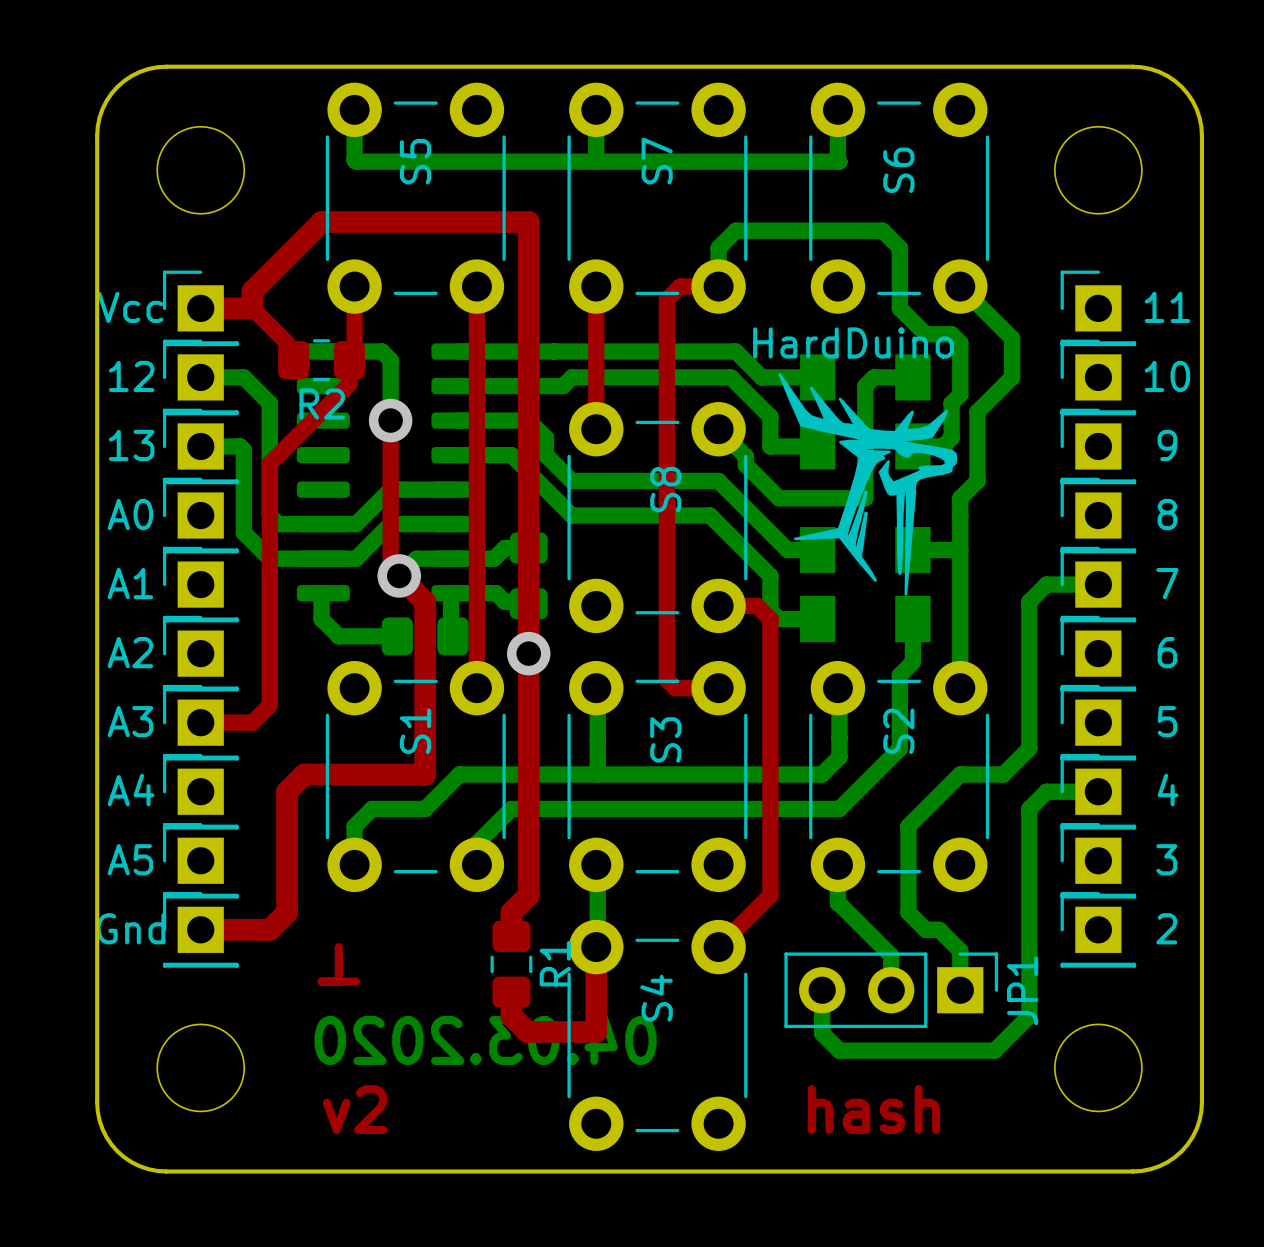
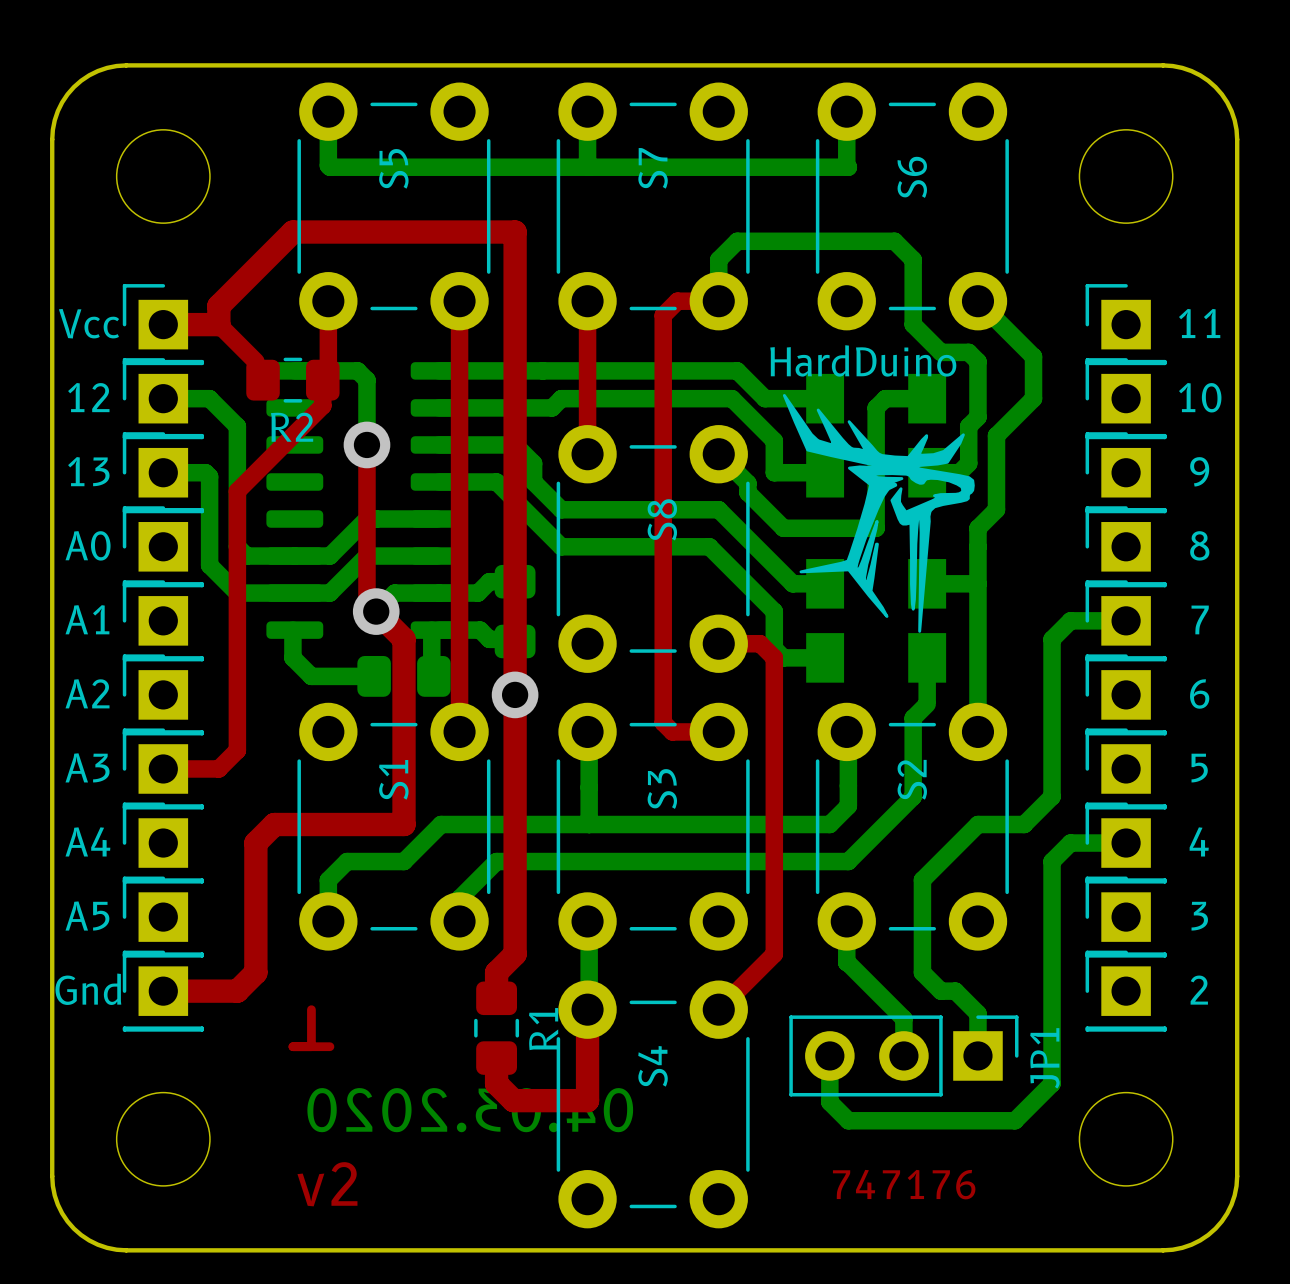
text: hash (873, 1109) -> 747176 (904, 1184)

